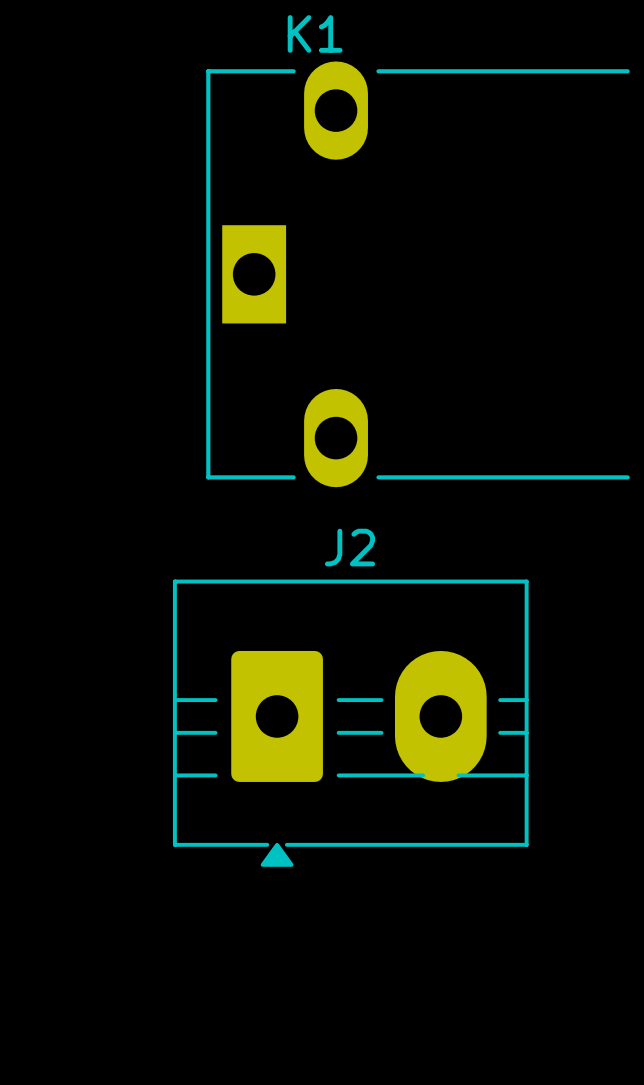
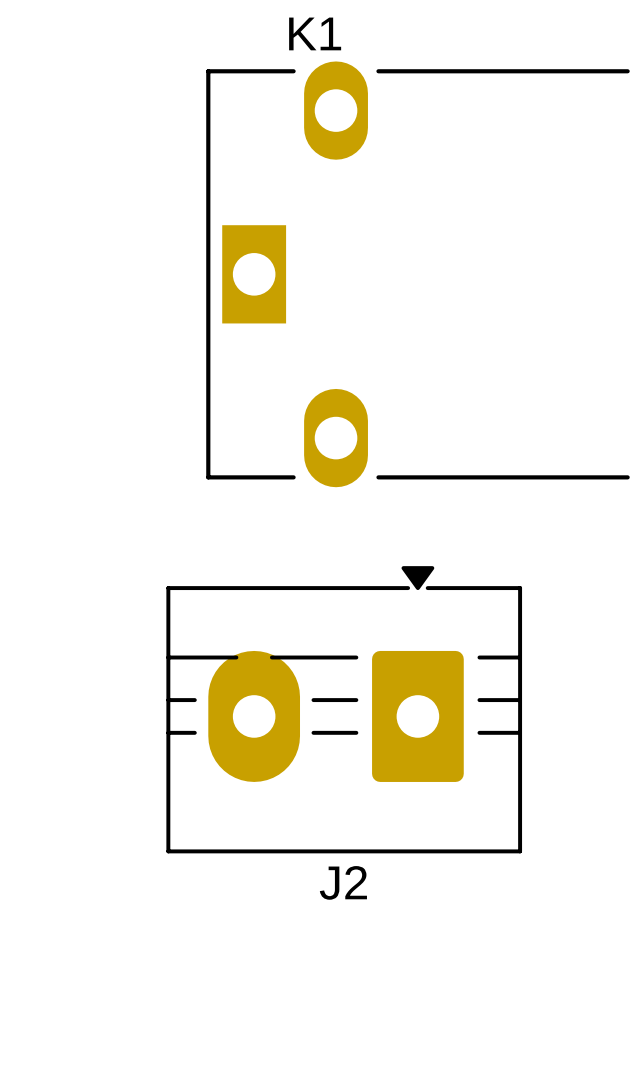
J2 rotation: 0° (350, 723) -> 180° (344, 709)

